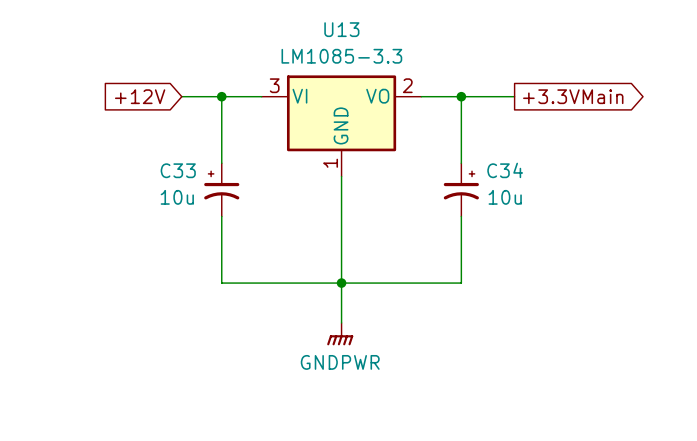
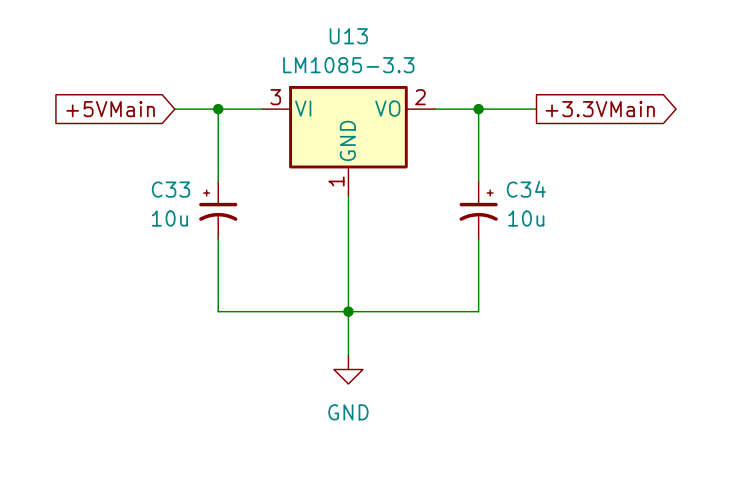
global label: +12V (140, 96) -> +5VMain (110, 109)
power symbol: GNDPWR (340, 334) -> GND (348, 369)

